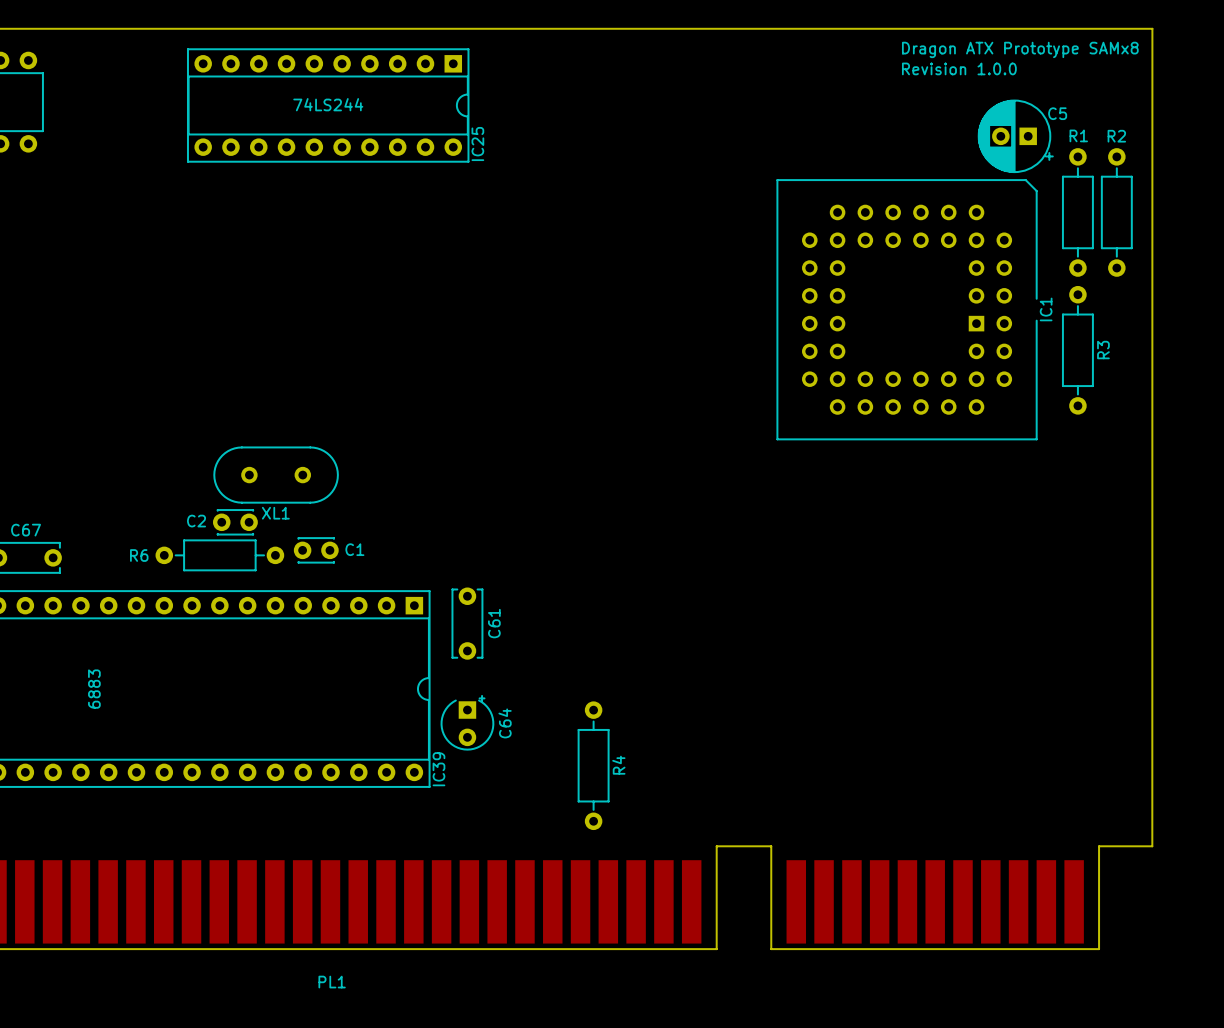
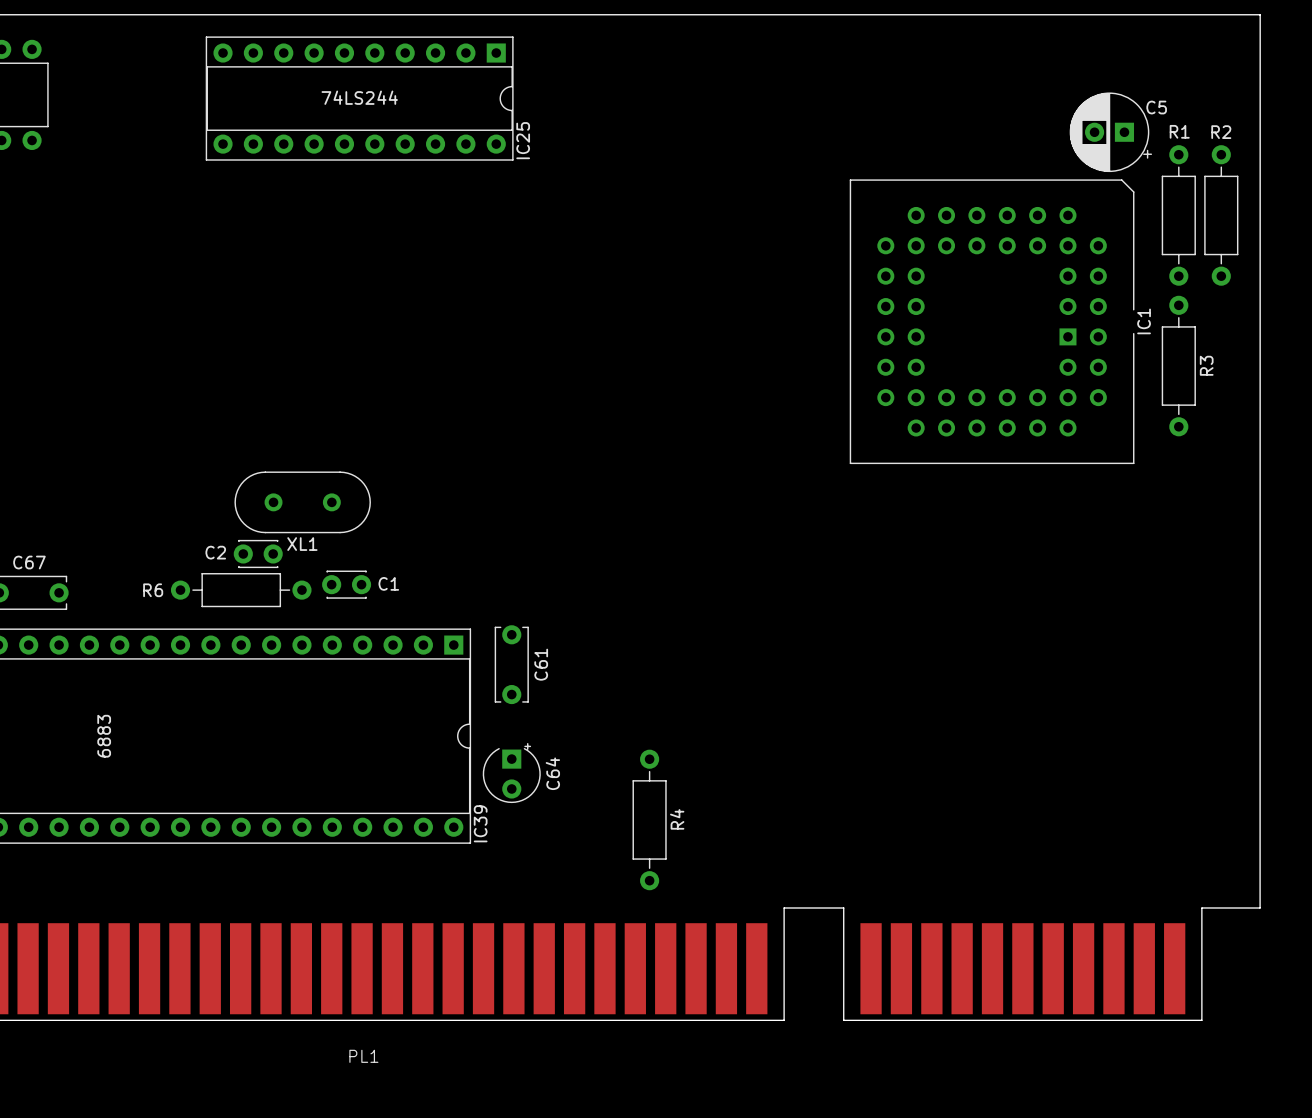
text: Dragon ATX Prototype SAMx8 (1020, 49) -> none
text: Revision 1.0.0 (959, 68) -> none

